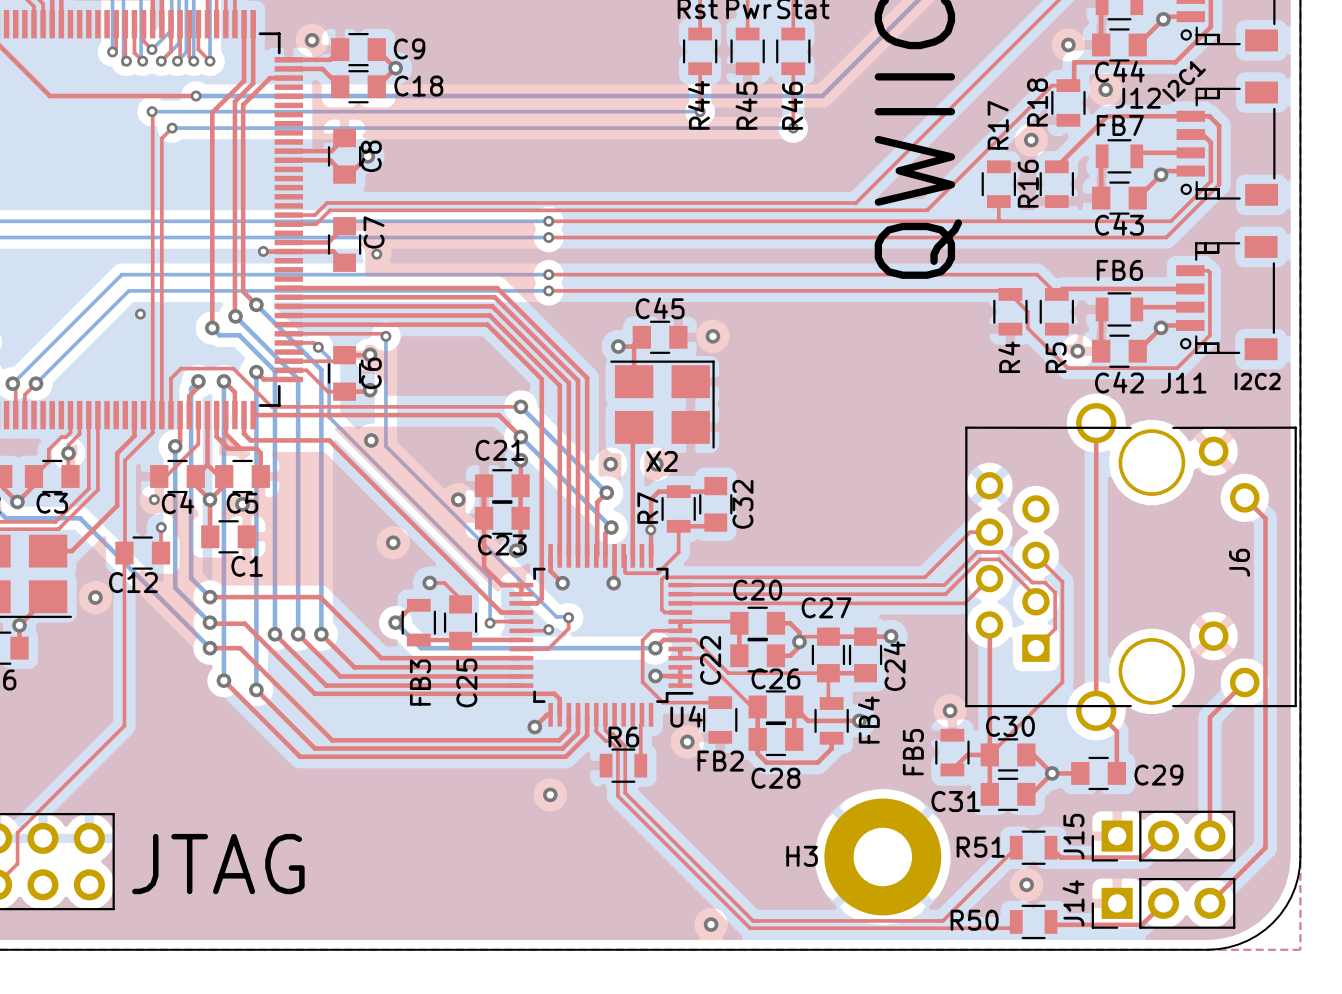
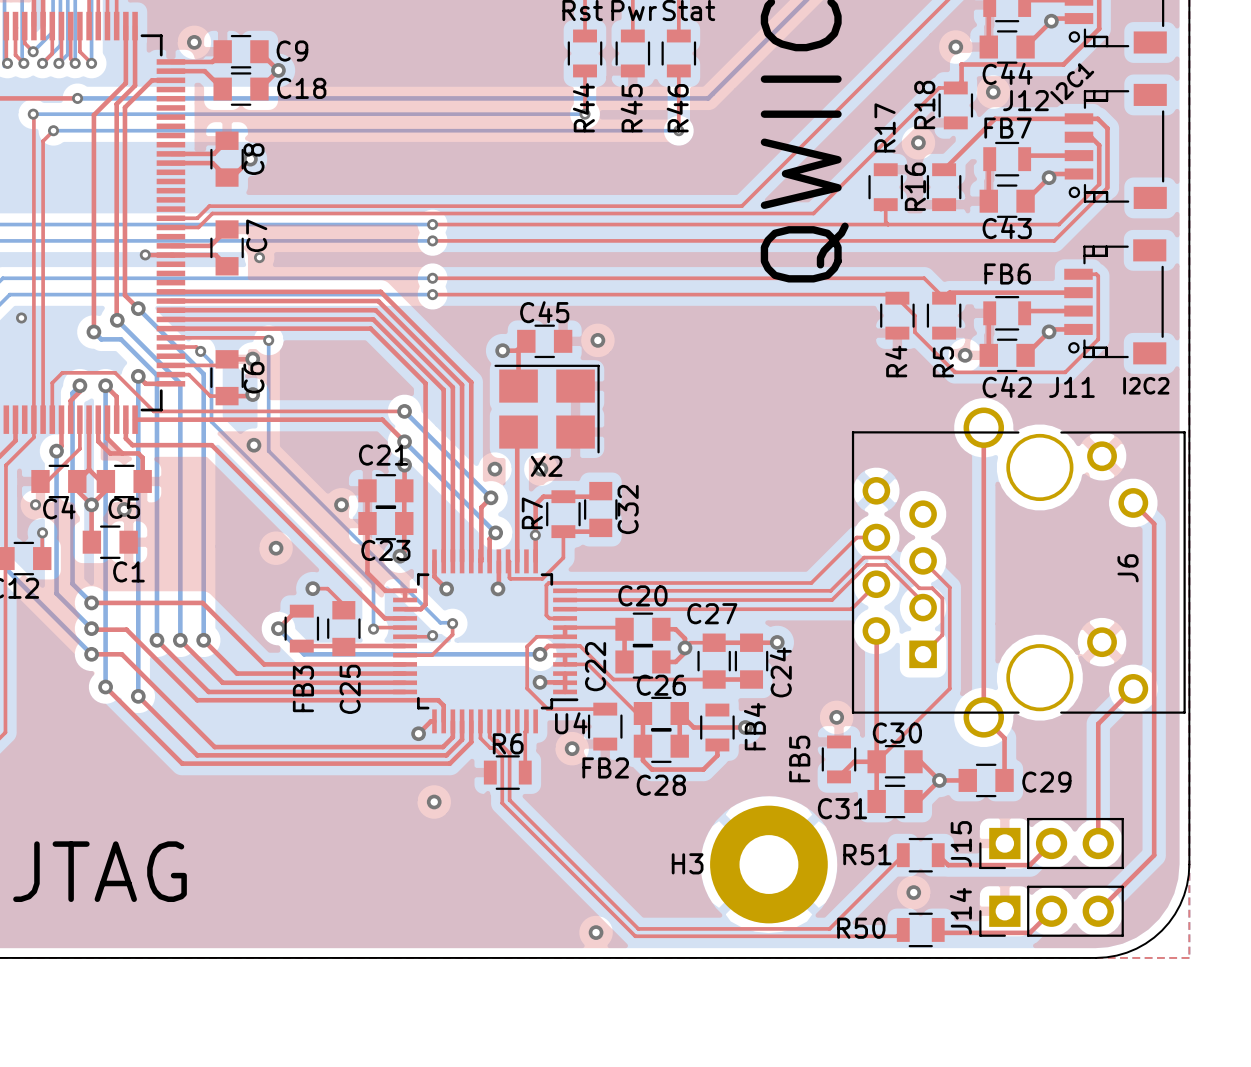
top track: (828, 673) (828, 700) (831, 703) -> none

